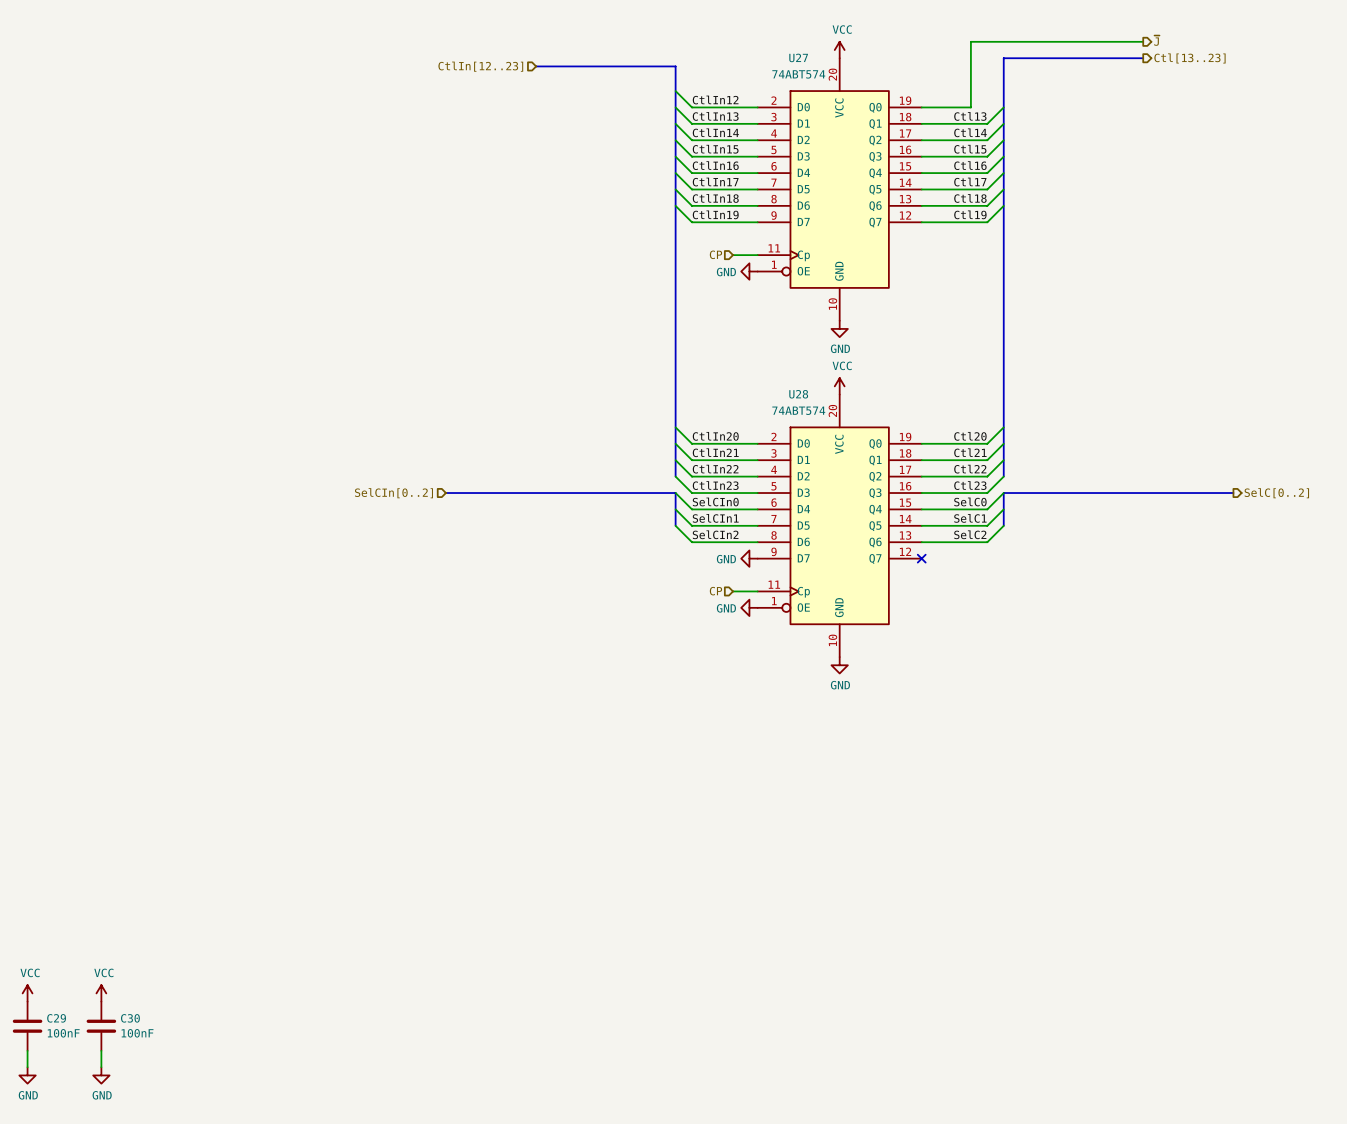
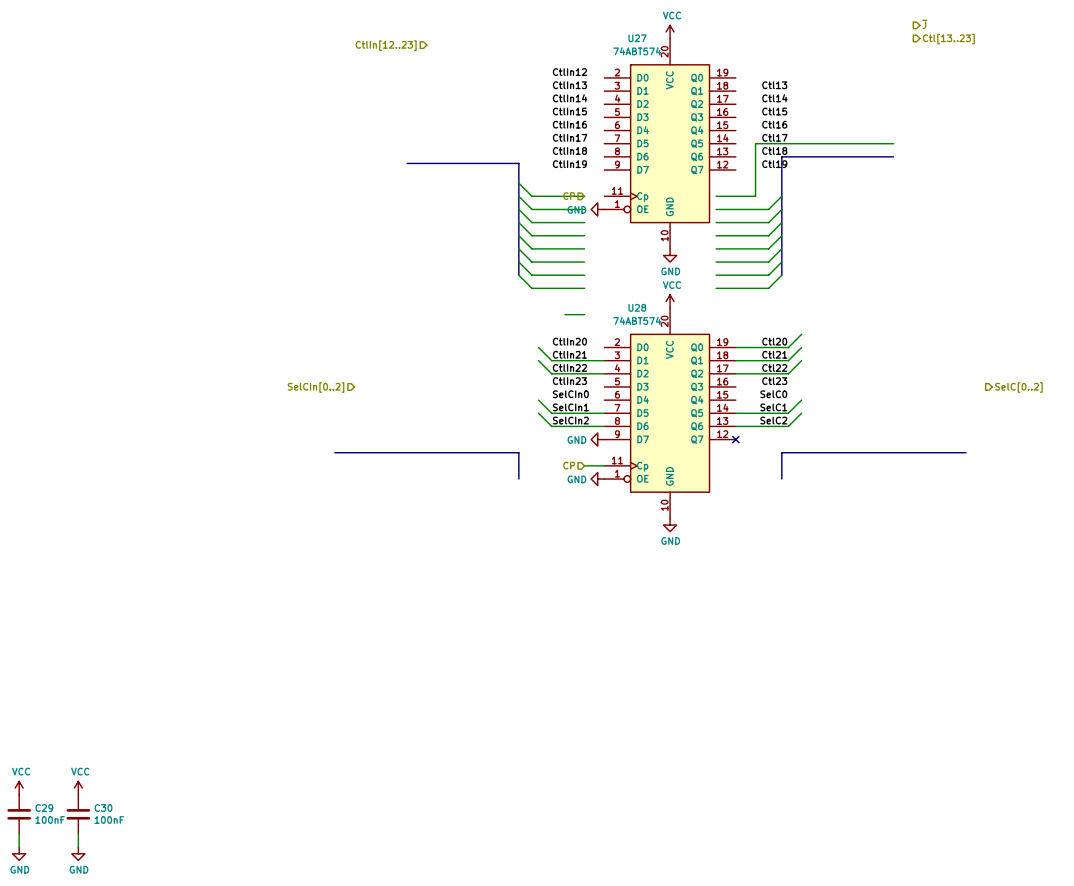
wire: (1143, 41) (970, 41) (970, 107) (921, 107) -> none
bus: (1143, 58) (1003, 58) (1003, 476) -> none
bus: (536, 66) (675, 66) (675, 476) -> none
wire: (675, 91) (692, 107) (757, 107) -> none
wire: (675, 107) (692, 123) (757, 123) -> (518, 196) (532, 209) (584, 209)
wire: (1003, 107) (987, 123) (921, 123) -> (781, 196) (768, 209) (716, 209)
wire: (675, 123) (692, 140) (757, 140) -> (518, 209) (532, 222) (584, 222)
wire: (1003, 123) (987, 140) (921, 140) -> (781, 209) (768, 222) (716, 222)
wire: (675, 140) (692, 156) (757, 156) -> (518, 222) (532, 235) (584, 235)
wire: (1003, 140) (987, 156) (921, 156) -> (781, 222) (768, 235) (716, 235)
wire: (675, 156) (692, 173) (757, 173) -> (518, 235) (532, 248) (584, 248)
wire: (1003, 156) (987, 173) (921, 173) -> (781, 235) (768, 248) (716, 248)
wire: (675, 173) (692, 189) (757, 189) -> (518, 248) (532, 262) (584, 262)
wire: (1003, 173) (987, 189) -> (893, 143) (788, 143)
wire: (675, 189) (692, 205) (757, 205) -> (518, 262) (532, 275) (584, 275)
wire: (921, 189) (946, 189) -> (716, 196) (755, 196) (755, 143)
wire: (1003, 189) (987, 205) (921, 205) -> (781, 262) (768, 275) (716, 275)
wire: (675, 205) (692, 222) (757, 222) -> (518, 275) (532, 288) (584, 288)
wire: (1003, 205) (987, 222) (921, 222) -> (781, 275) (768, 288) (716, 288)
bus: none -> (893, 156) (781, 156) (781, 275)
bus: none -> (407, 163) (518, 163) (518, 275)
wire: (733, 255) (757, 255) -> (584, 196) (532, 196) (518, 183)
wire: none -> (564, 314) (584, 314)
wire: (675, 427) (692, 443) (757, 443) -> none
wire: (675, 476) (692, 493) (757, 493) -> none
wire: (1003, 476) (987, 493) (921, 493) -> (781, 248) (768, 262) (716, 262)
bus: (445, 493) (675, 493) (675, 525) -> (334, 452) (518, 452) (518, 479)
wire: (675, 493) (692, 509) (757, 509) -> none
wire: (1003, 493) (987, 509) (921, 509) -> none
bus: (1233, 493) (1003, 493) (1003, 525) -> (965, 452) (781, 452) (781, 479)

